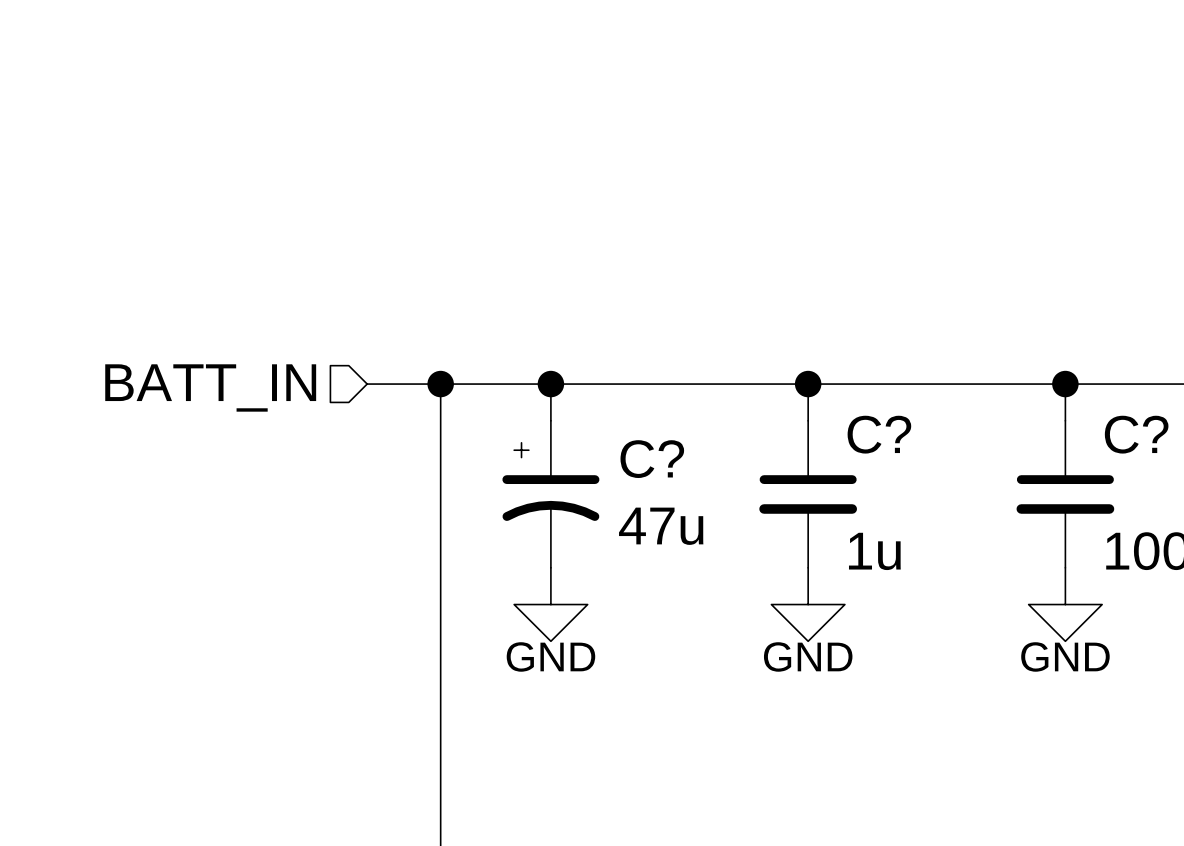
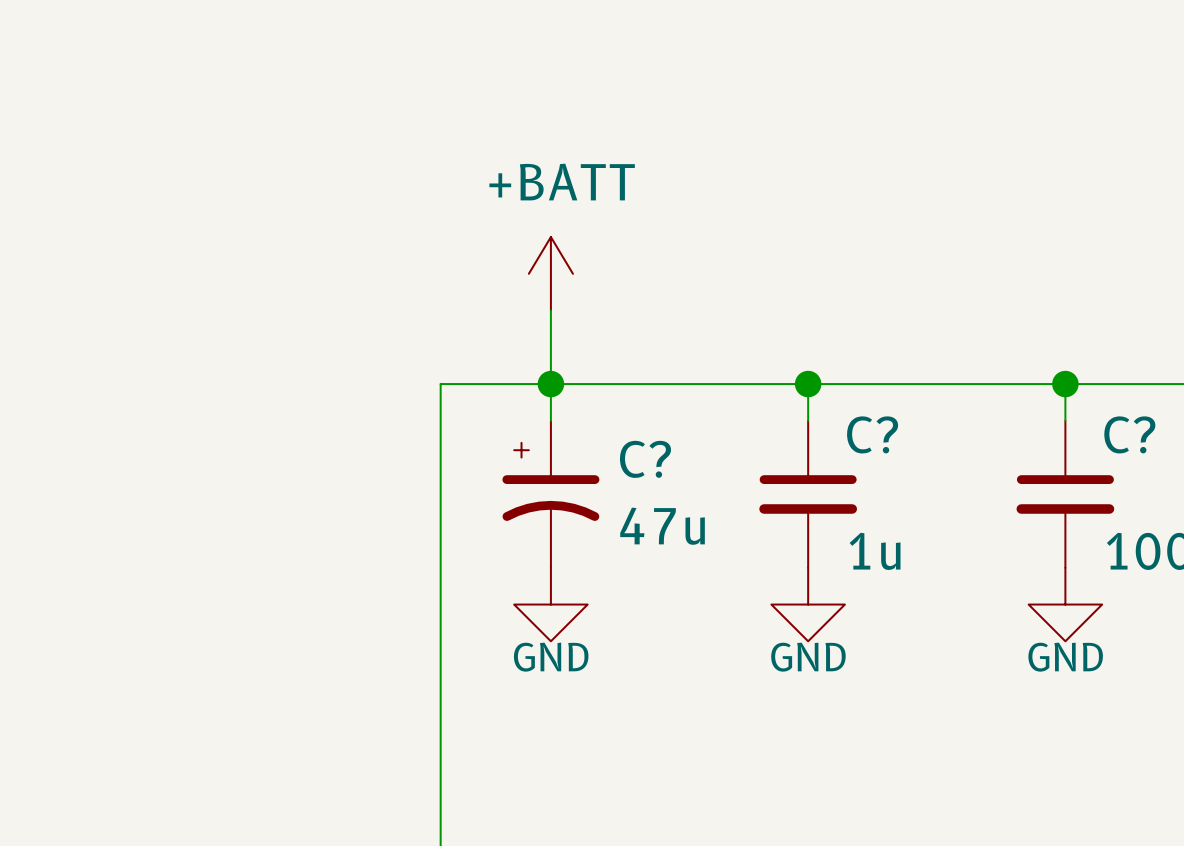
power symbol: none -> +BATT (550, 273)
wire: none -> (550, 310) (550, 384)
wire: (367, 384) (440, 384) -> none
junction: (440, 384) -> none
hierarchical label: BATT_IN (210, 387) -> none

